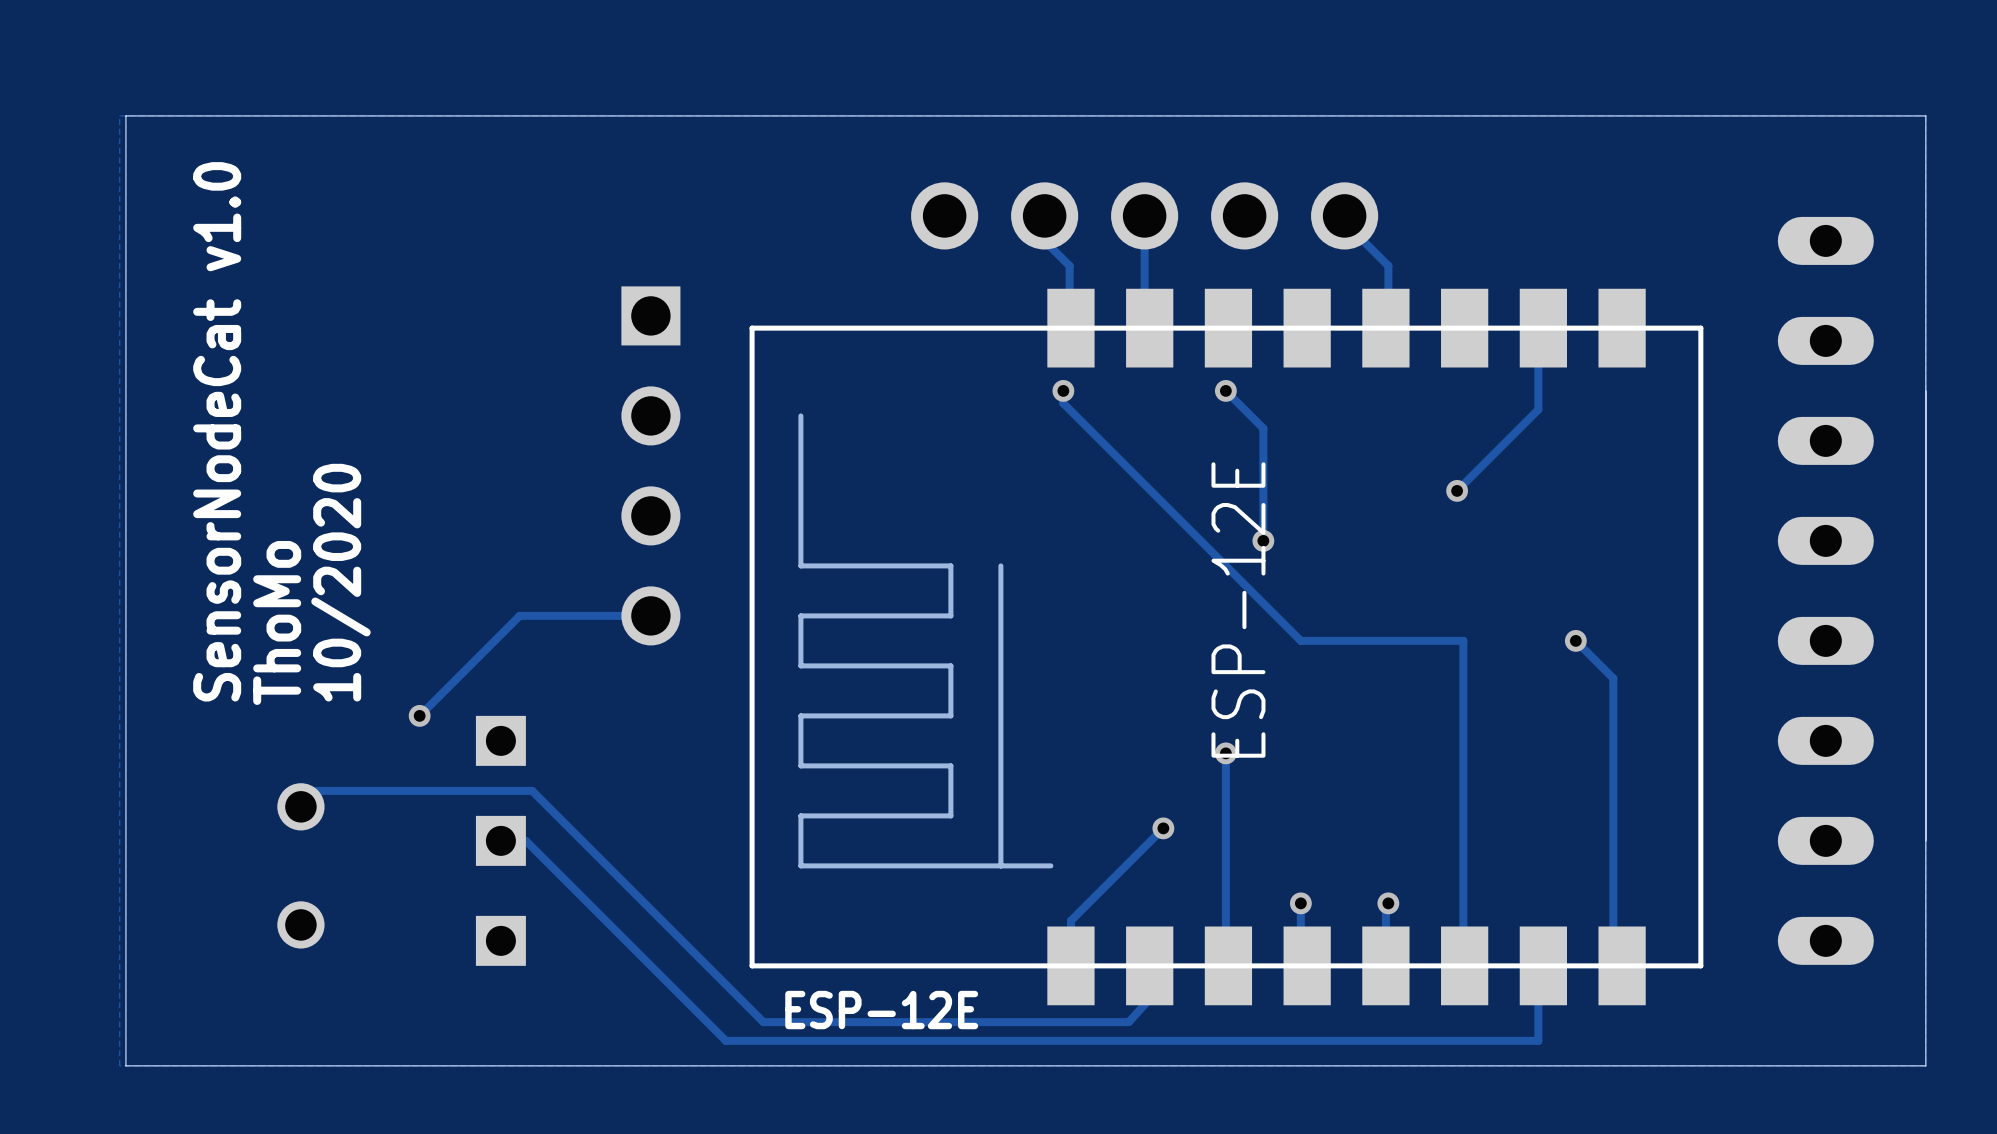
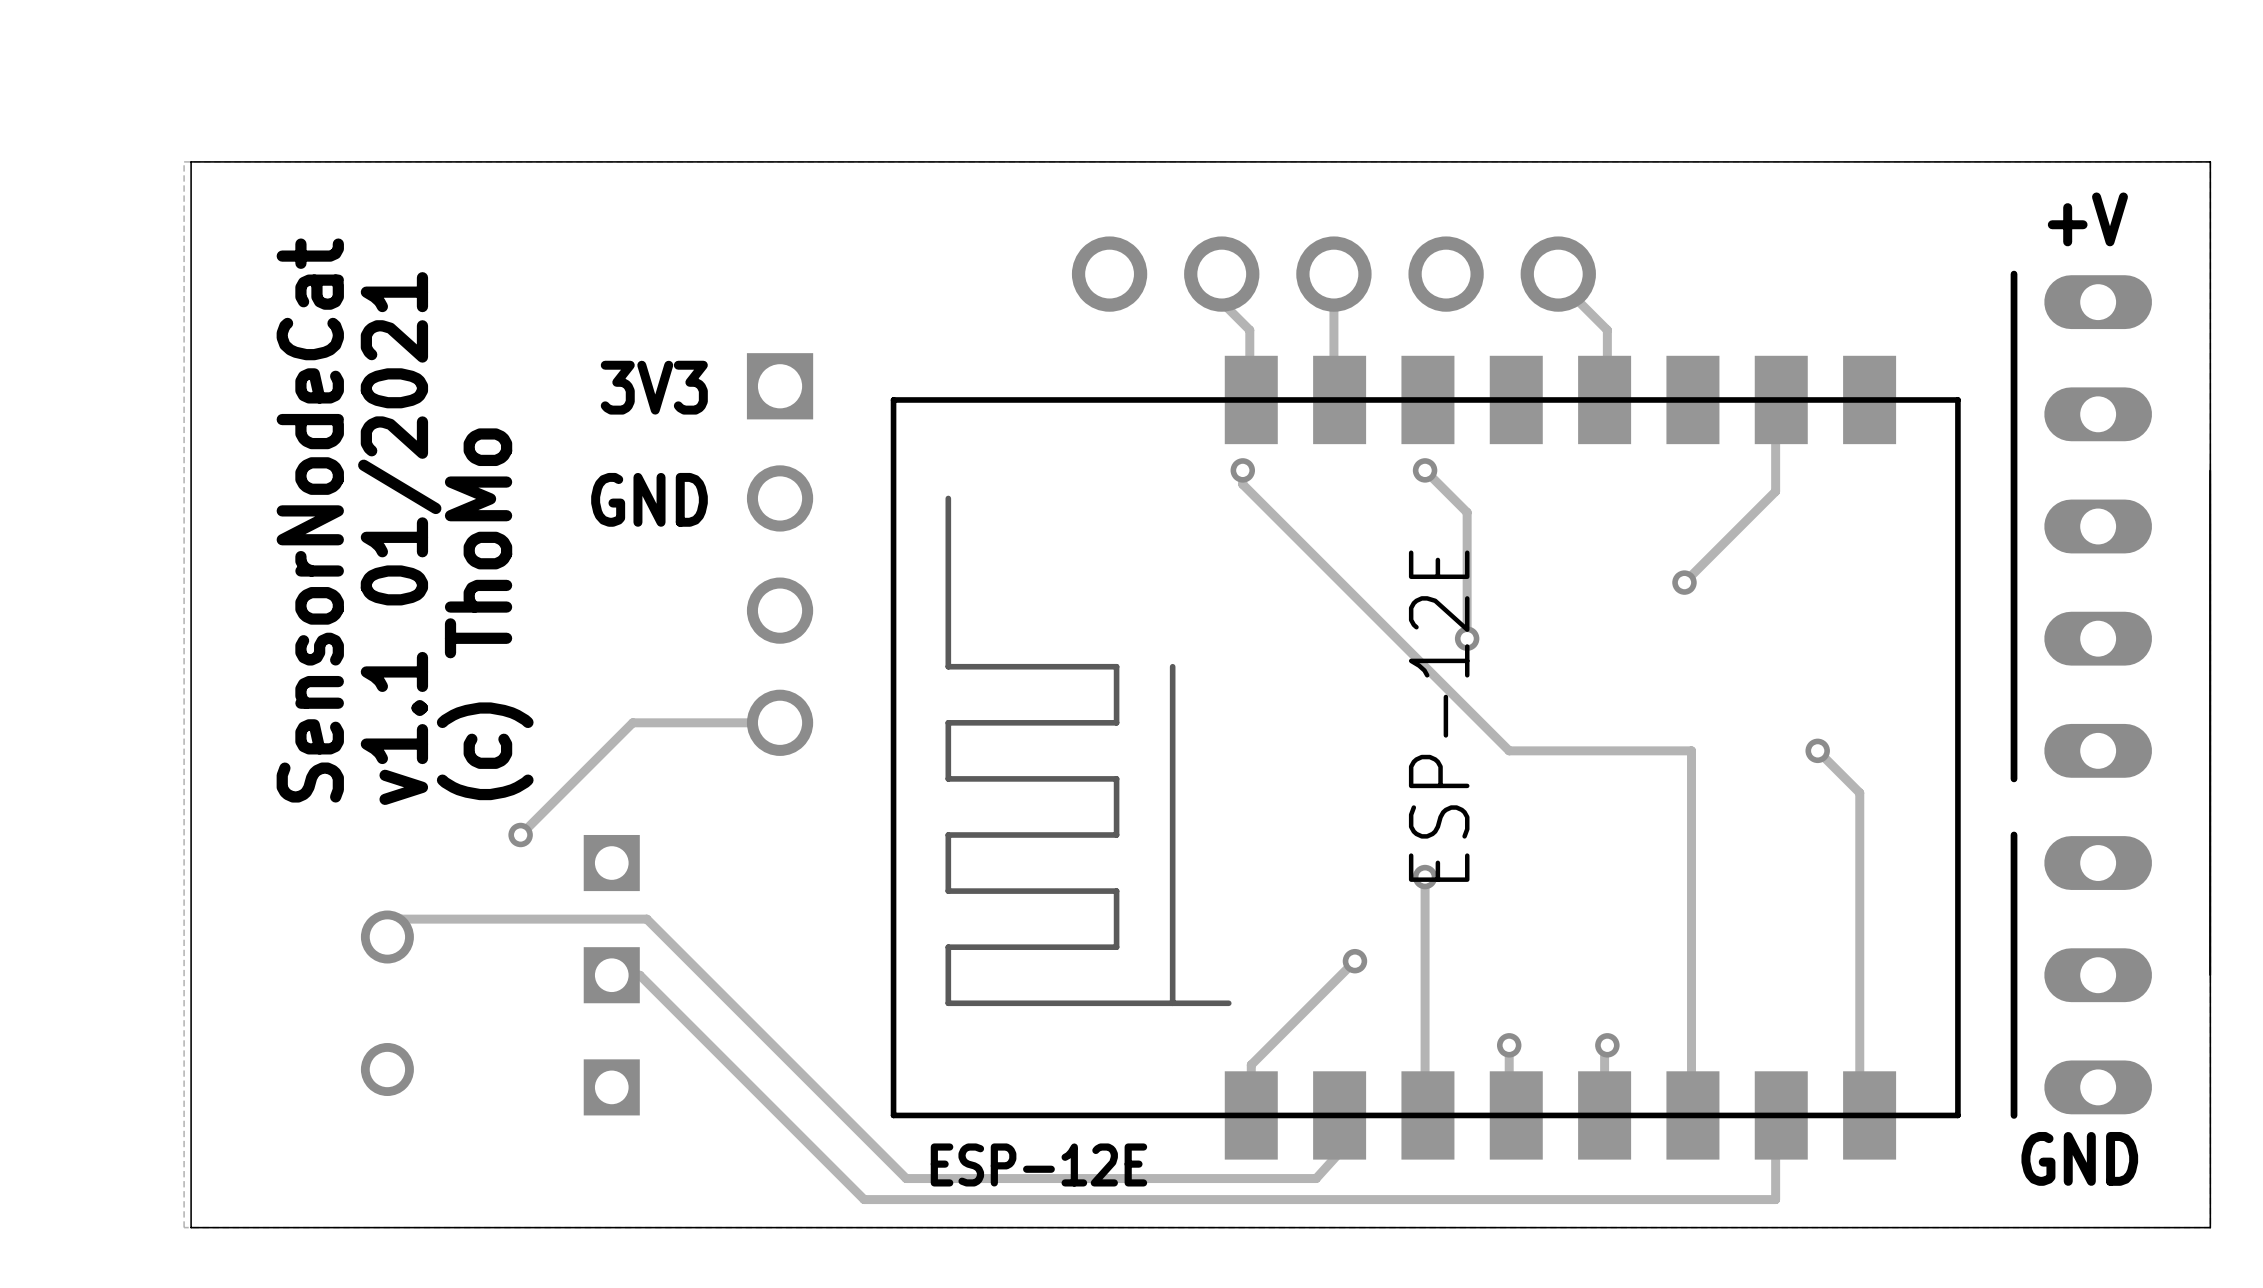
text: none -> +V (2087, 219)
line: none -> (2014, 274) (2014, 778)
text: none -> 3V3 (654, 387)
text: none -> GND (649, 499)
text: SensorNodeCat v1.0 (217, 431) -> SensorNodeCat (310, 520)
text: none -> (c) ThoMo (485, 614)
text: 10/2020 (340, 582) -> v1.1 01/2021 (399, 538)
text: ThoMo (277, 622) -> none
line: none -> (2014, 834) (2014, 1115)
text: none -> GND (2079, 1158)

